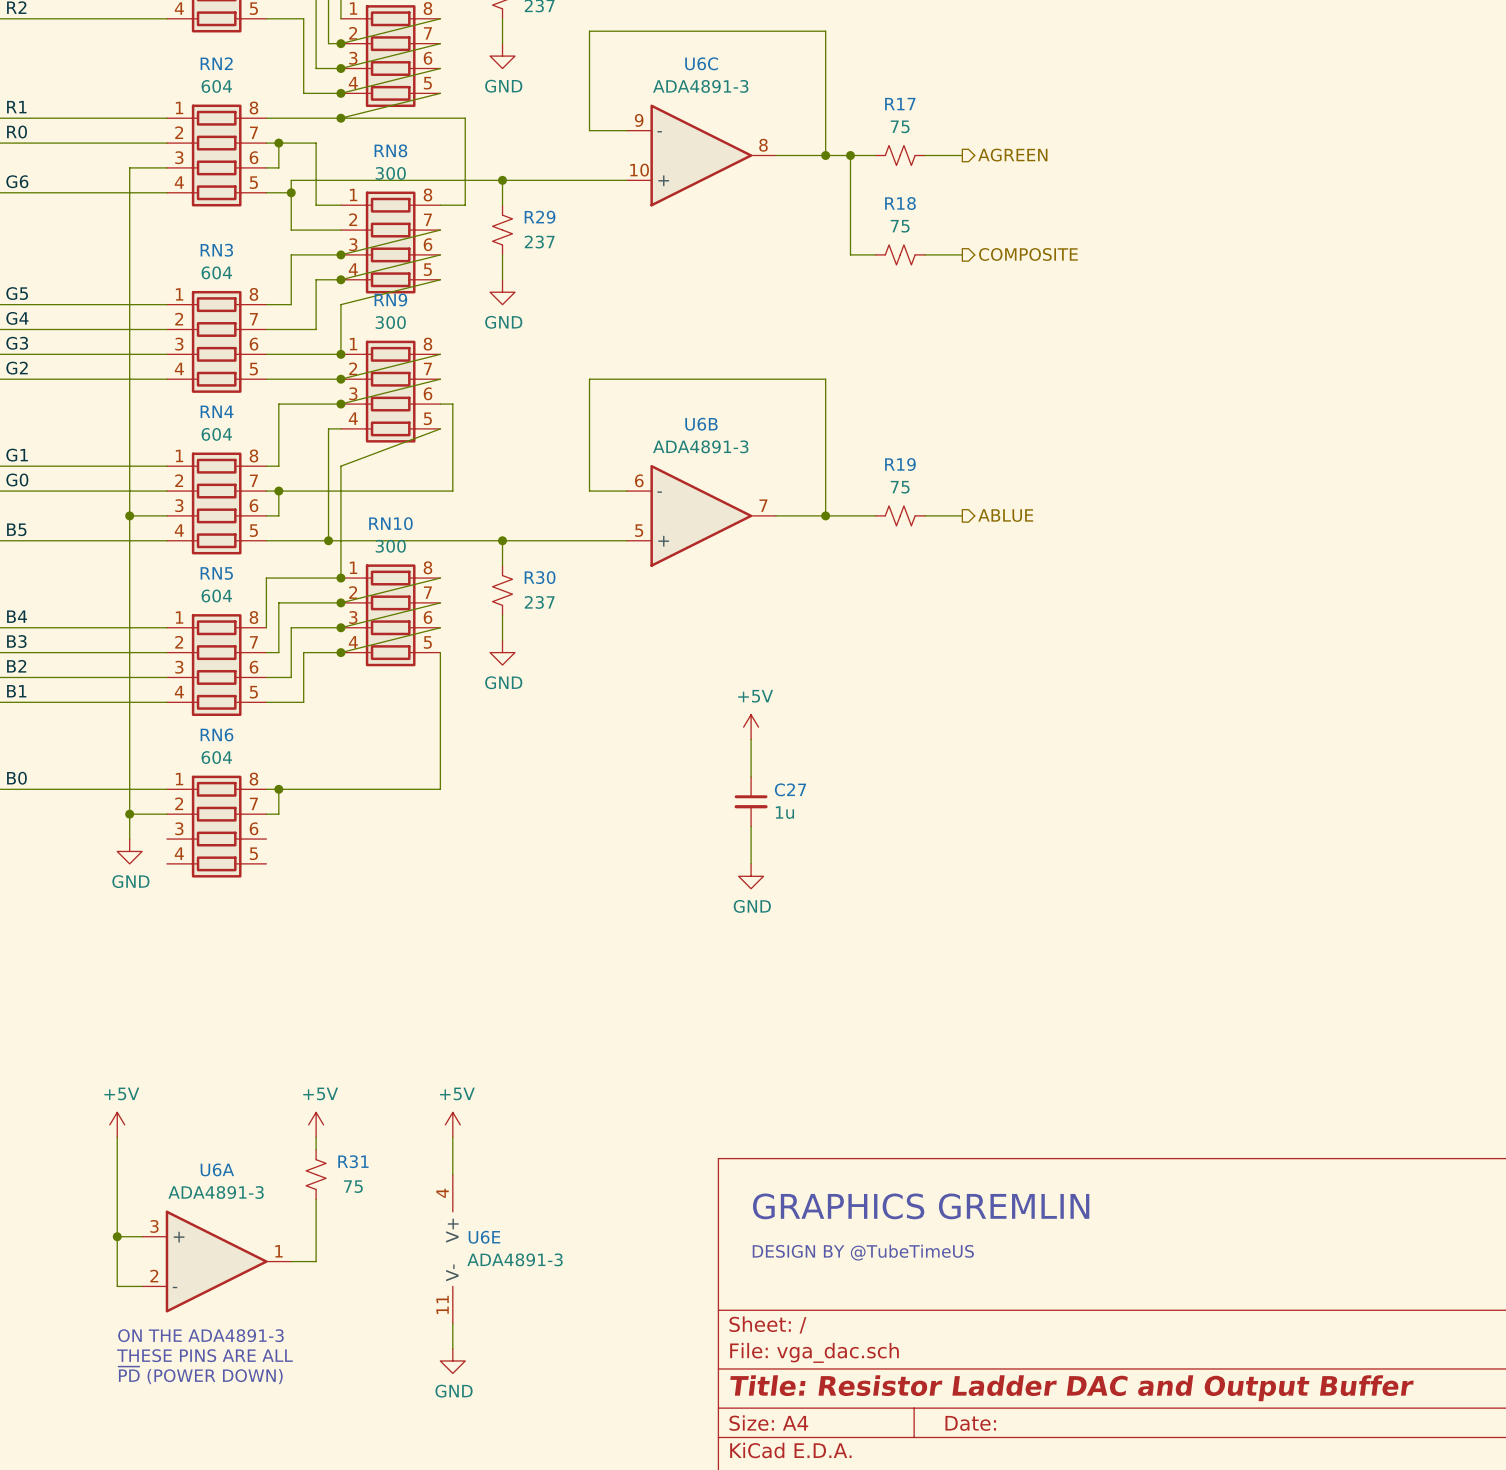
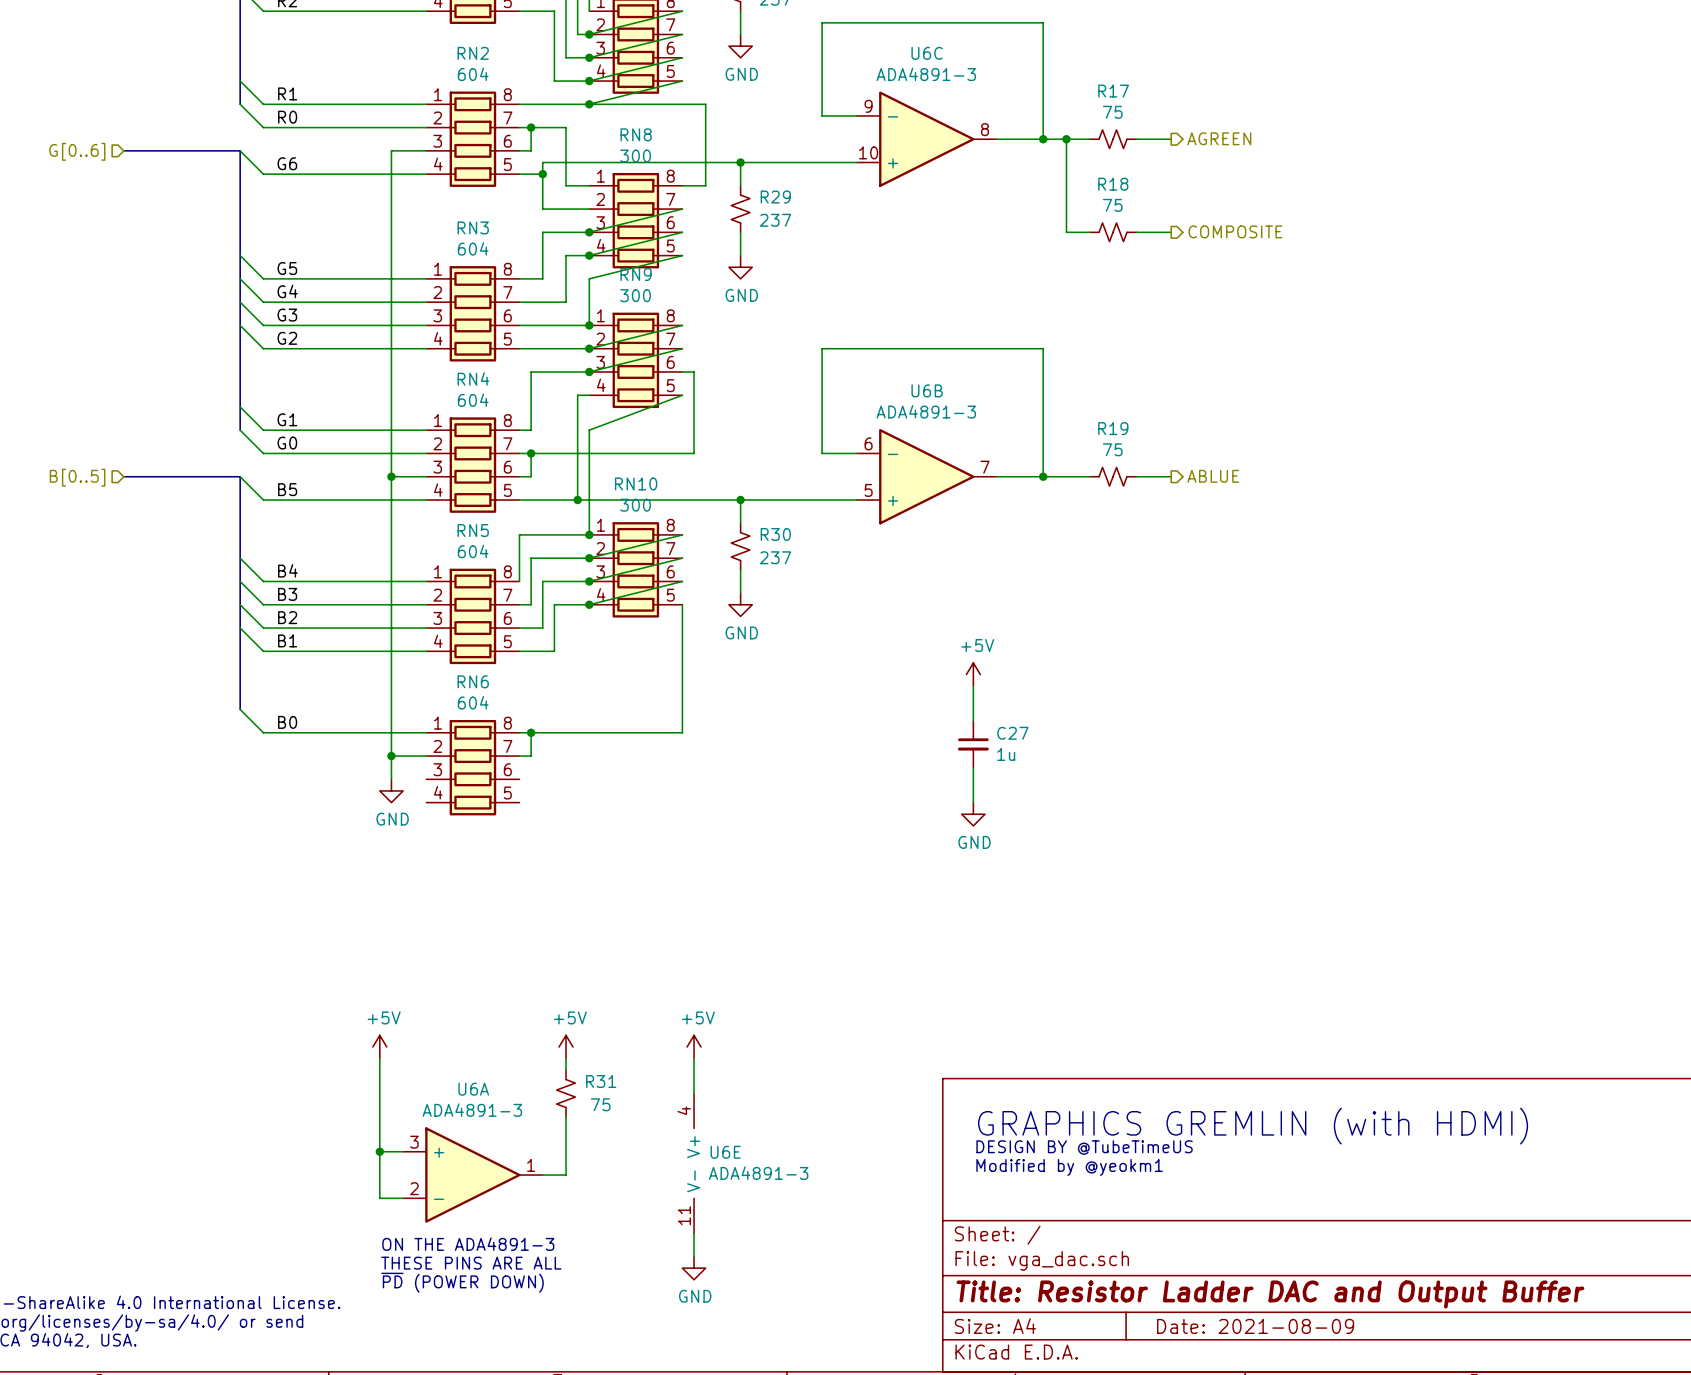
text: GRAPHICS GREMLIN (921, 1206) -> GRAPHICS GREMLIN (with HDMI) (1253, 1126)
text: none -> DESIGN BY @TubeTimeUS (1084, 1147)
text: DESIGN BY @TubeTimeUS (863, 1252) -> Modified by @yeokm1 (1069, 1167)
title block: Date: (970, 1423) -> Date: 2021-08-09 (1255, 1326)

